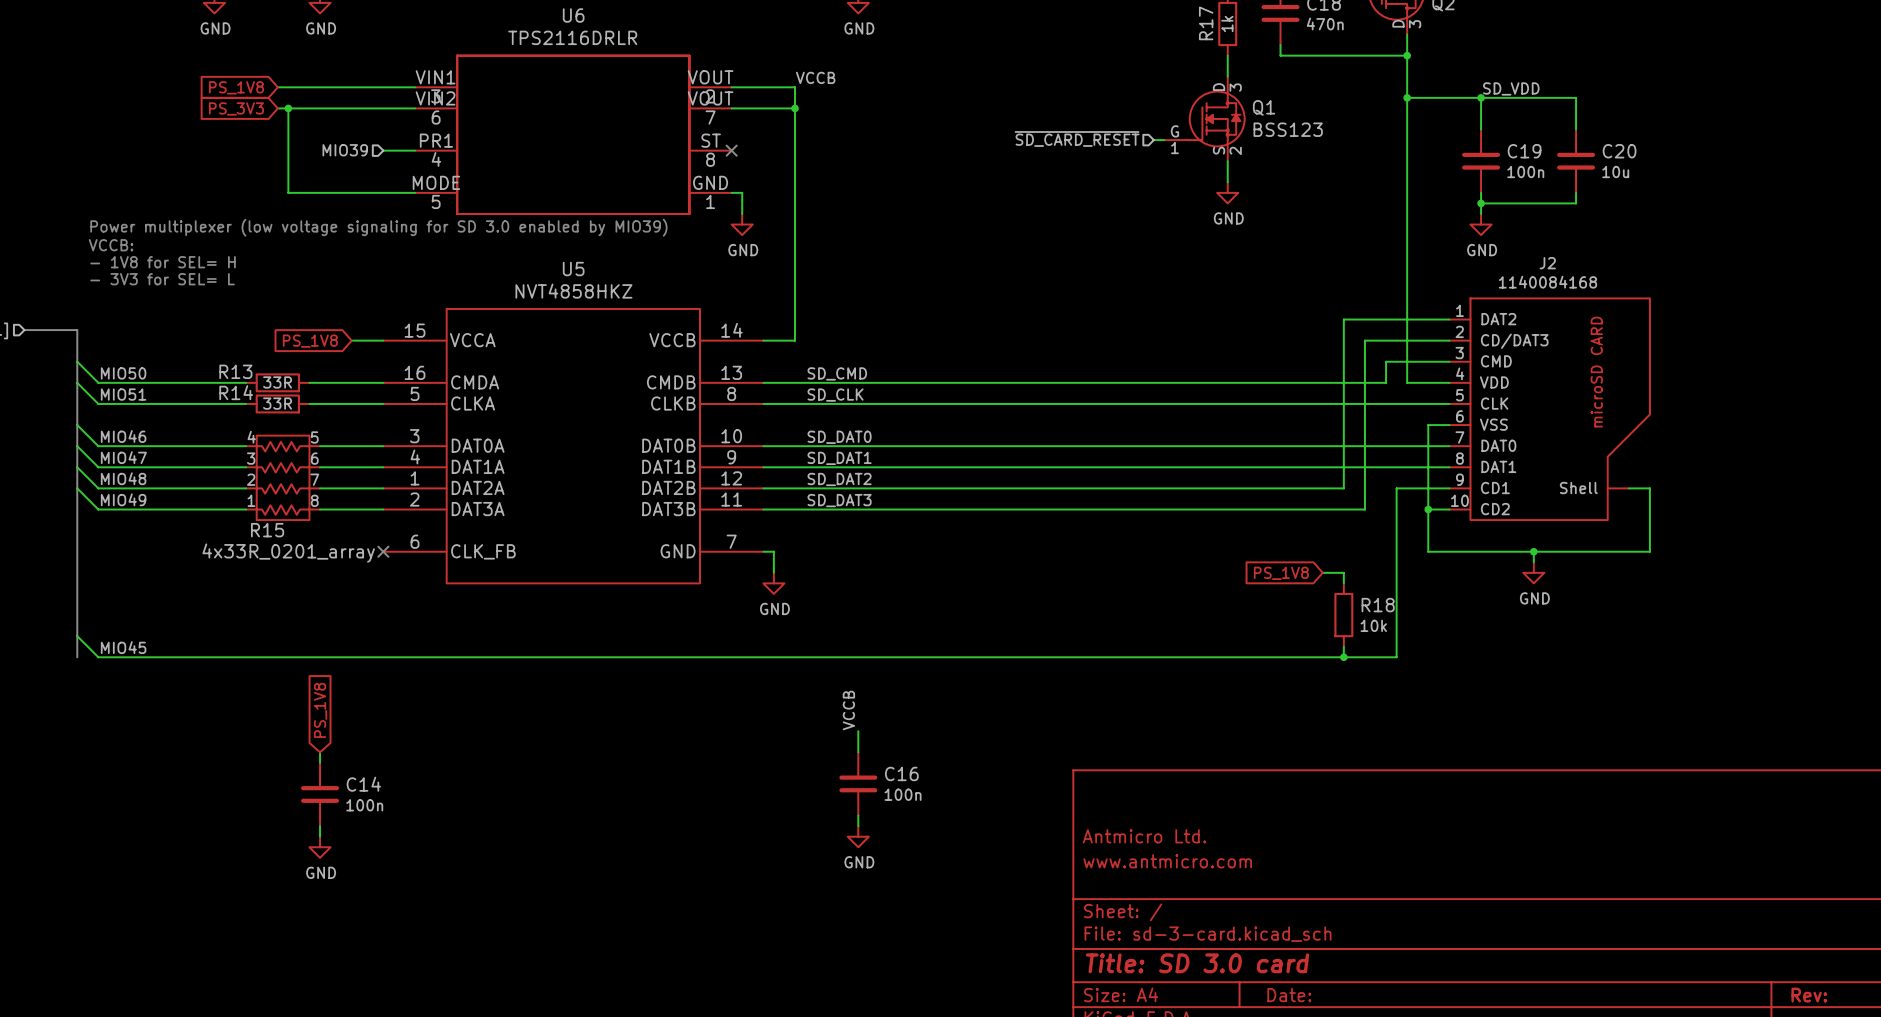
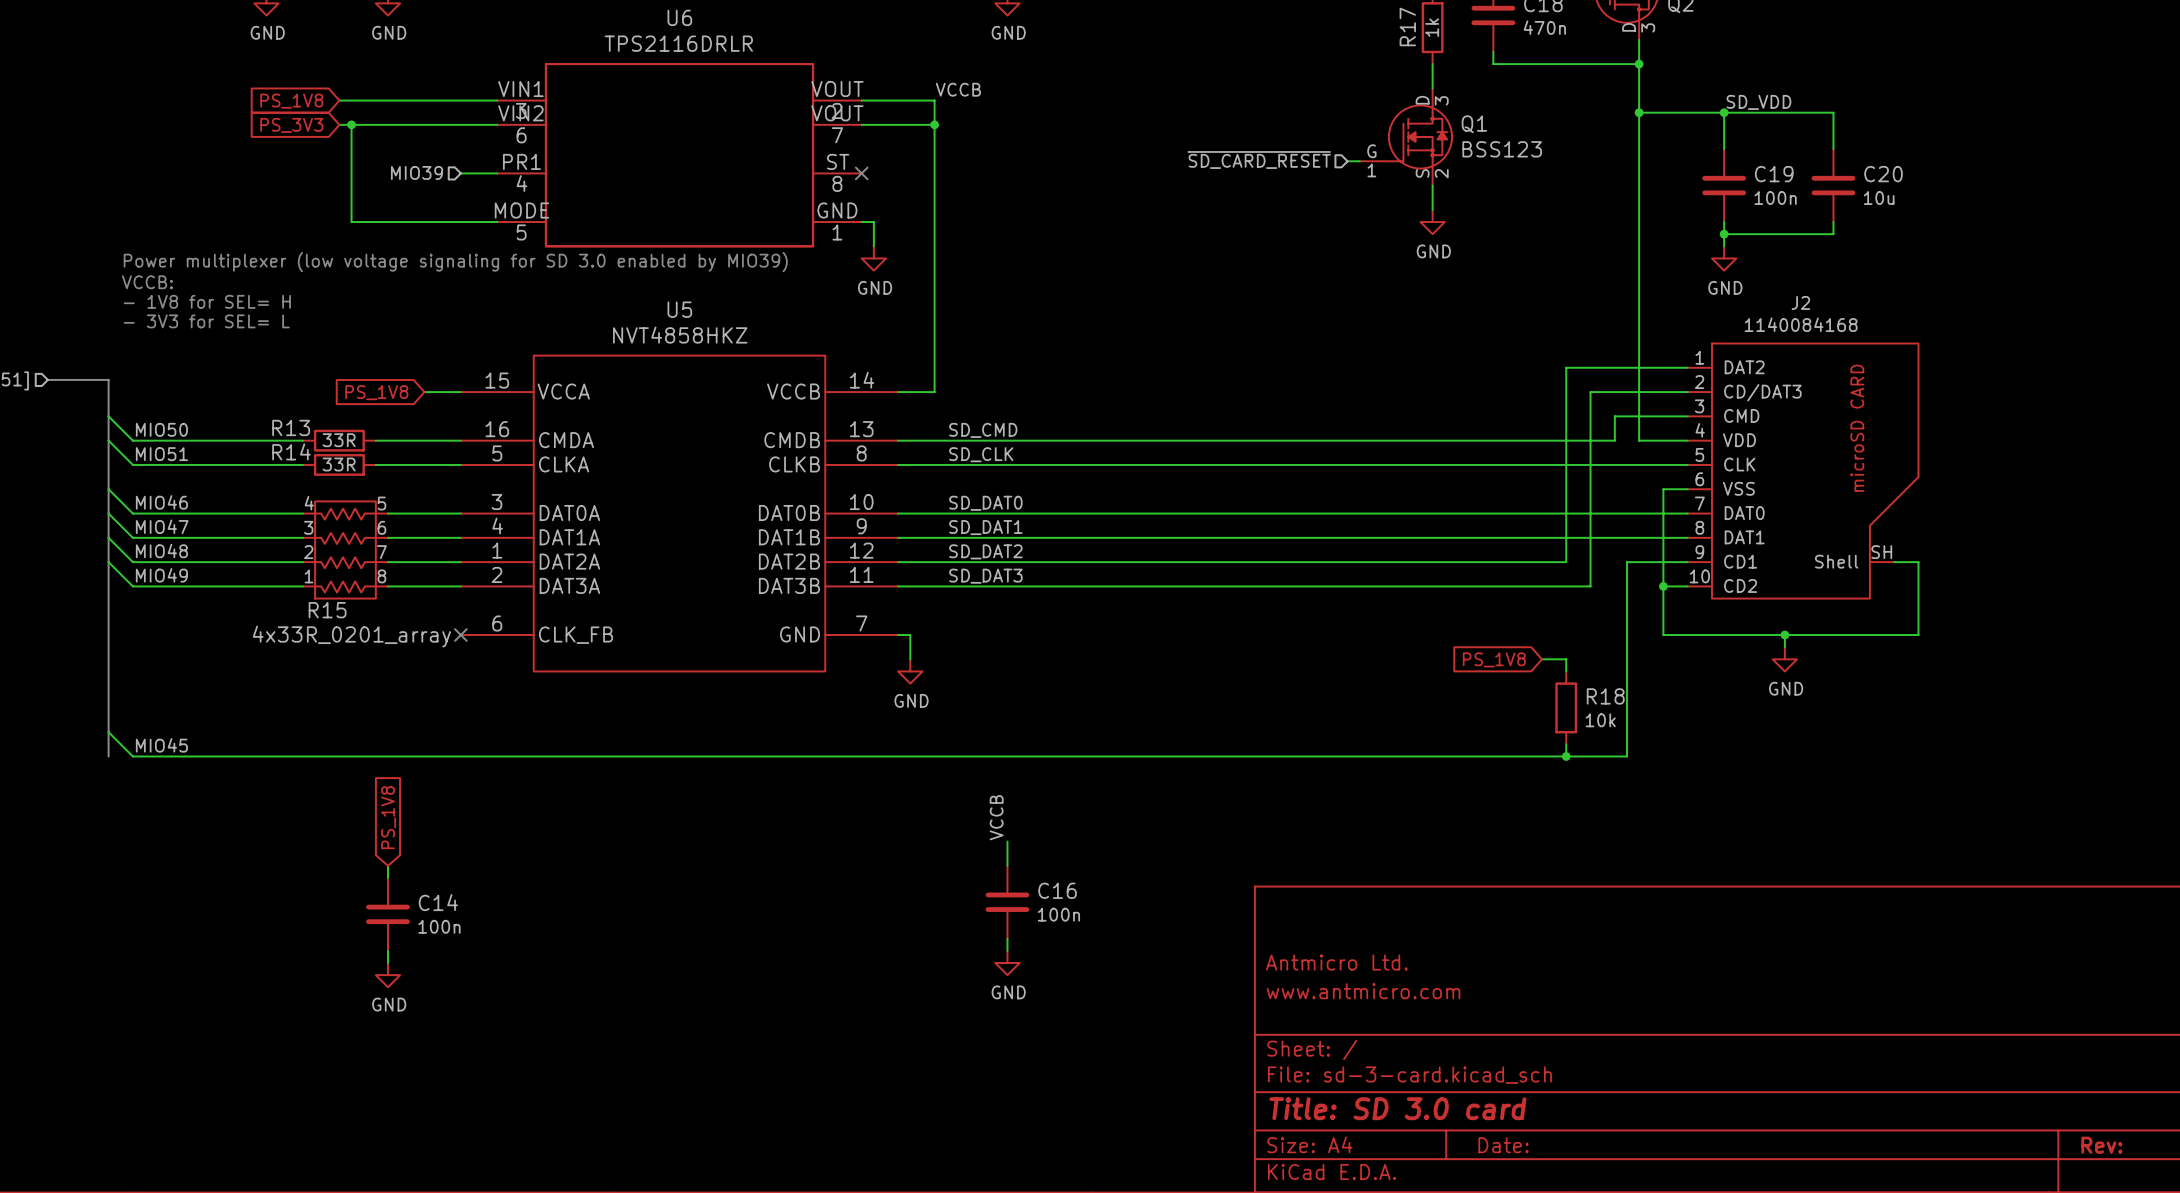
J2 pin number: none -> SH (1881, 552)

